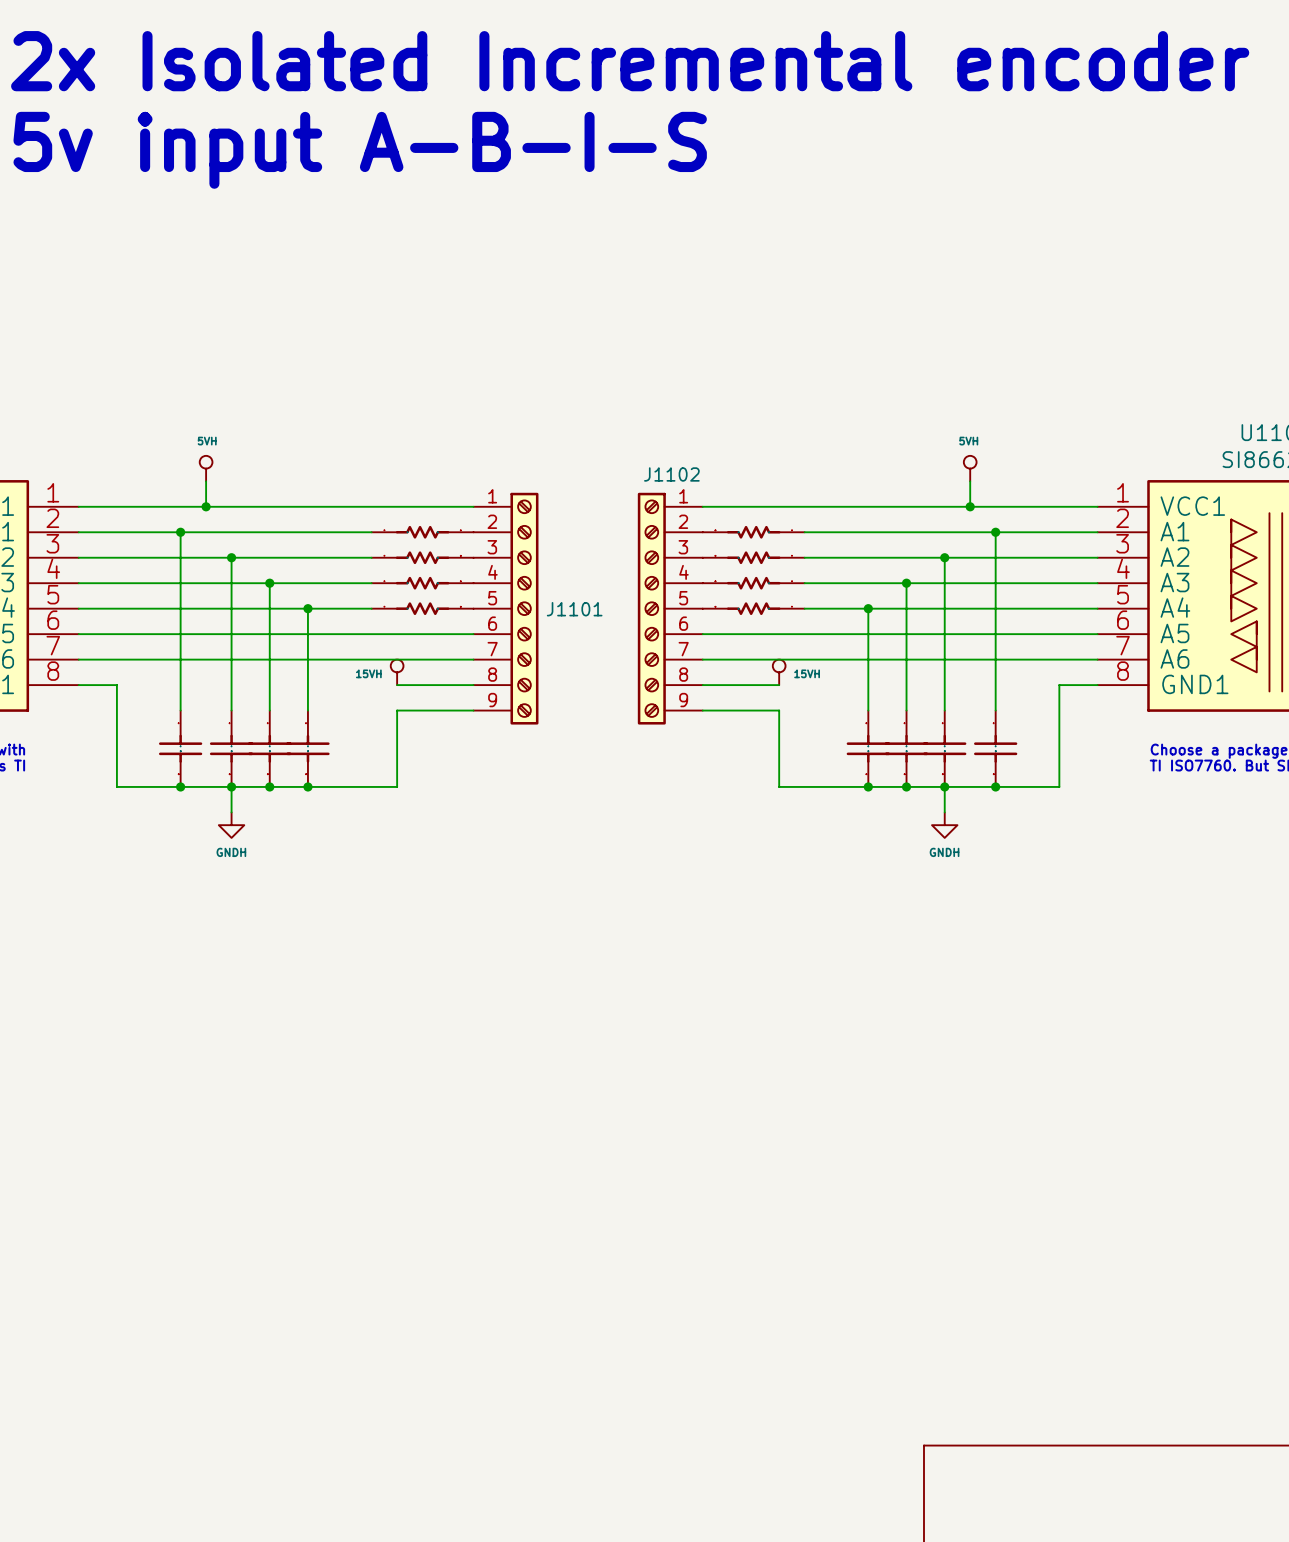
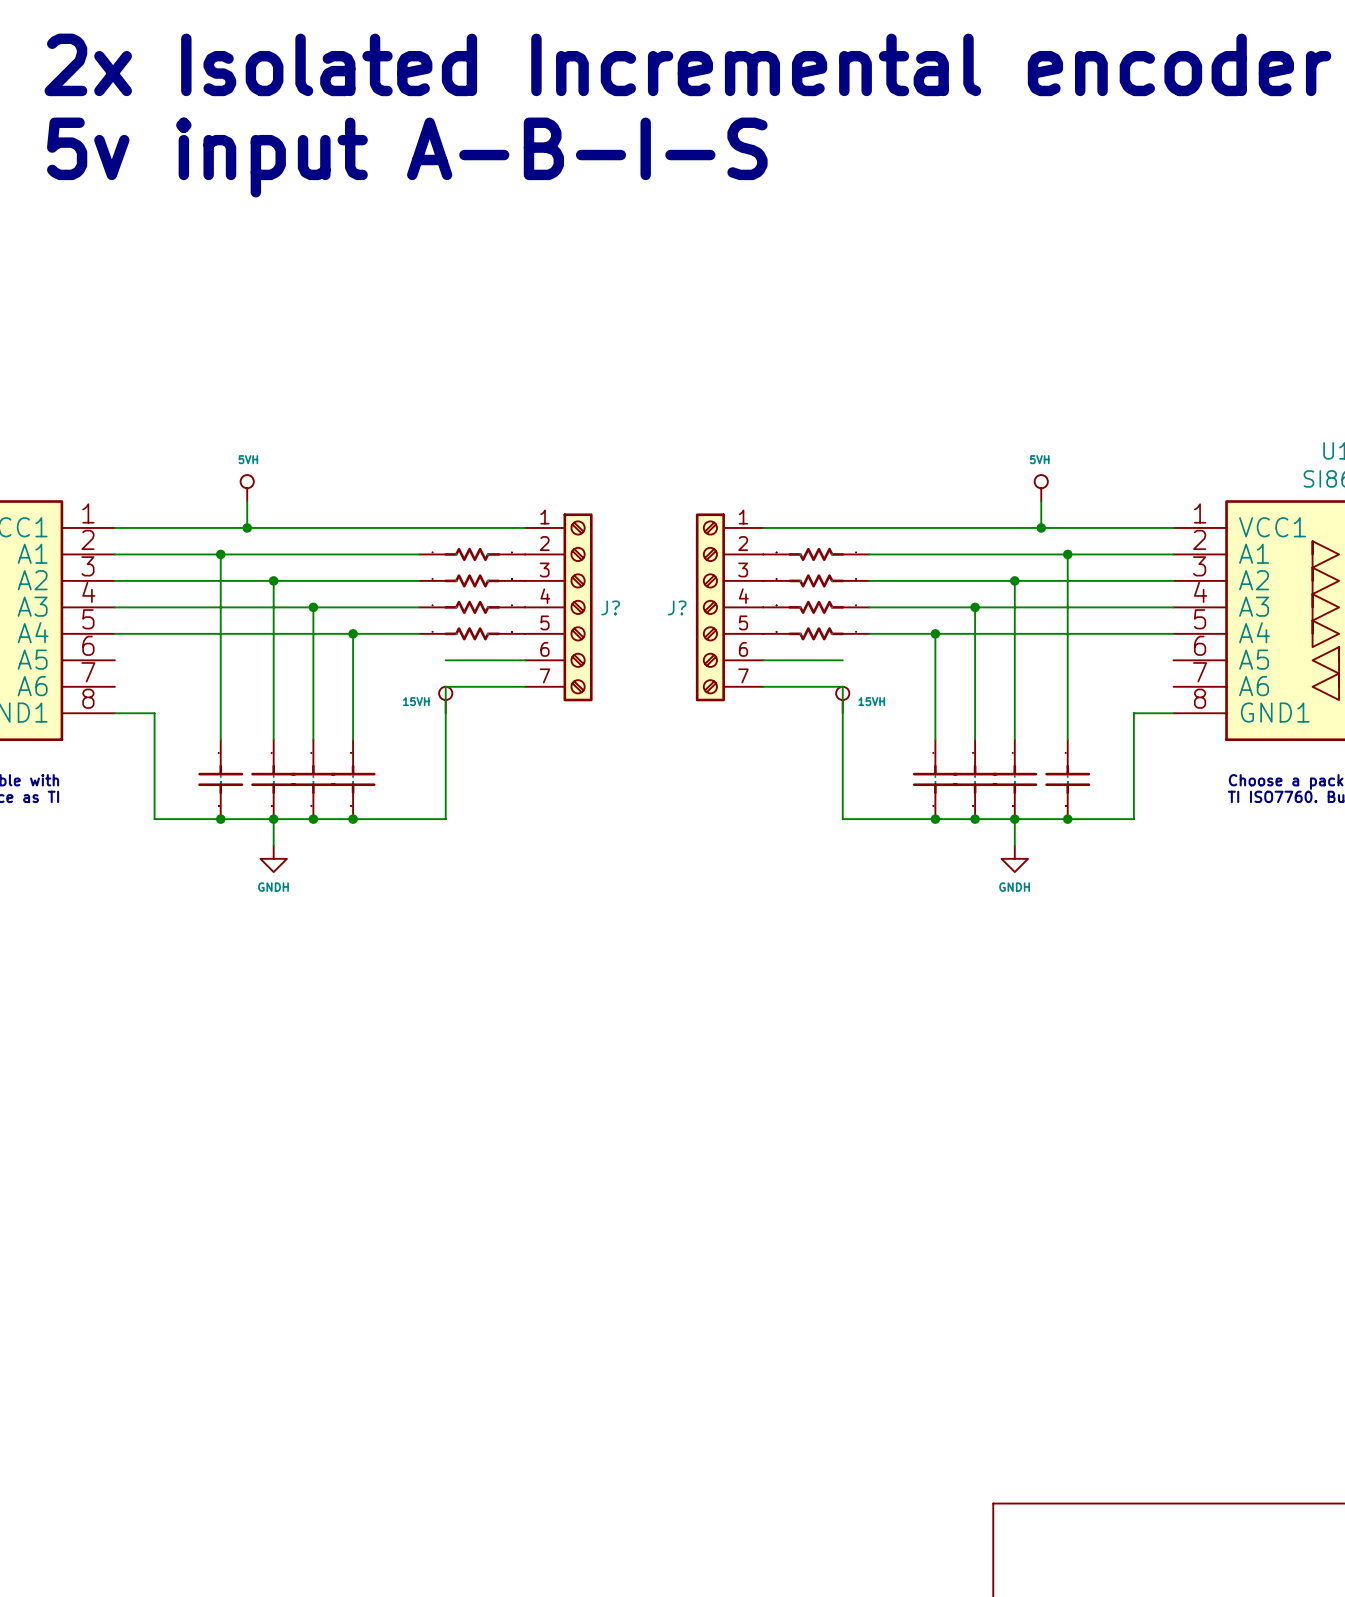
J?: none -> (558, 607)
J?: none -> (729, 607)
J1101: (506, 608) -> none
J1102: (670, 608) -> none
wire: (78, 634) (397, 634) -> none
wire: (779, 634) (1097, 634) -> none
wire: (78, 659) (397, 659) -> none
wire: (779, 659) (1097, 659) -> none
wire: (397, 685) (473, 685) -> none
wire: (702, 685) (779, 685) -> none
wire: (397, 710) (473, 710) -> (445, 739) (445, 686)
wire: (702, 710) (779, 710) -> (842, 686) (842, 739)

